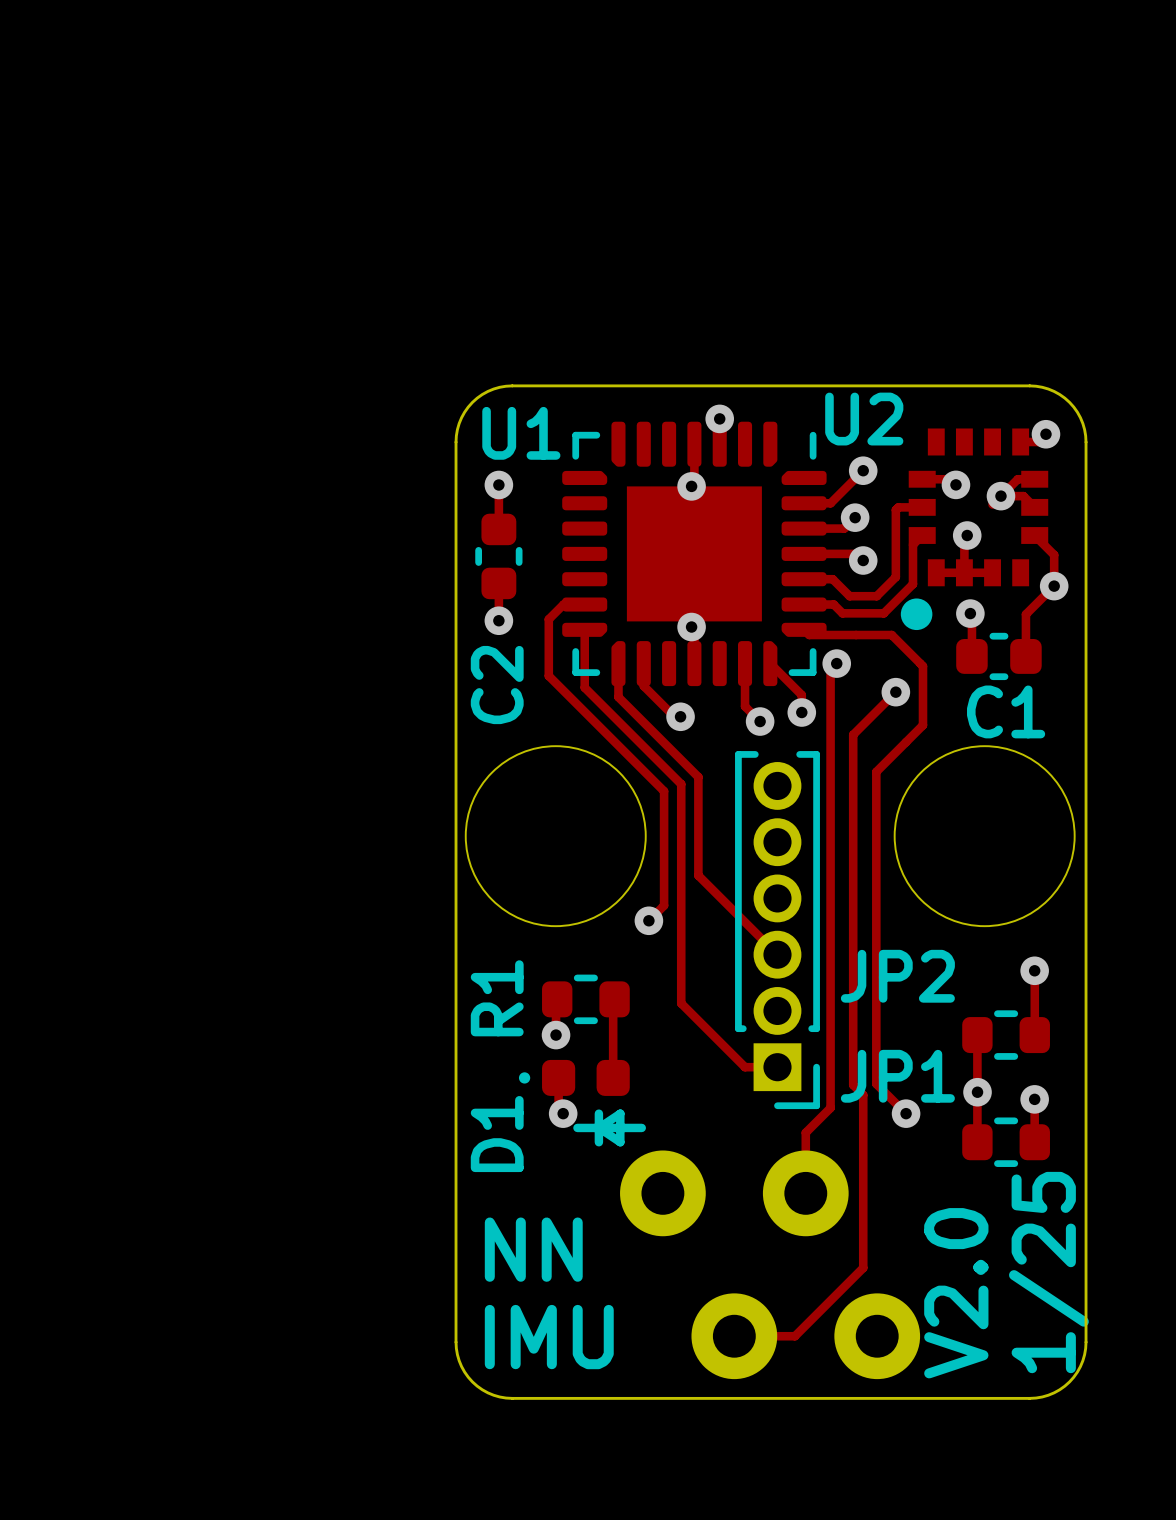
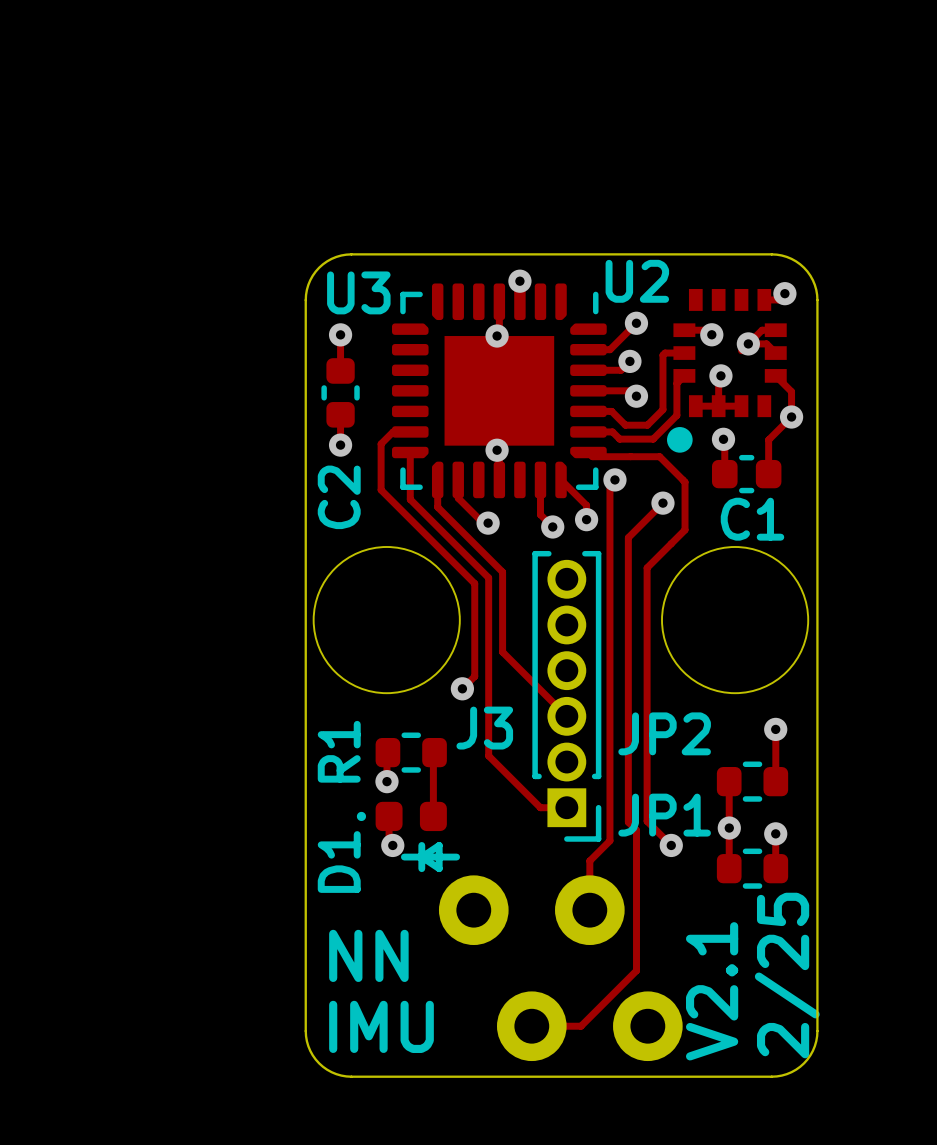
U1 name: U1 (521, 433) -> U3 (358, 292)
J3 name: none -> J3 (484, 728)
text: 1/25 (1048, 1272) -> 2/25 (787, 975)
text: V2.0 (956, 1293) -> V2.1 (712, 991)

